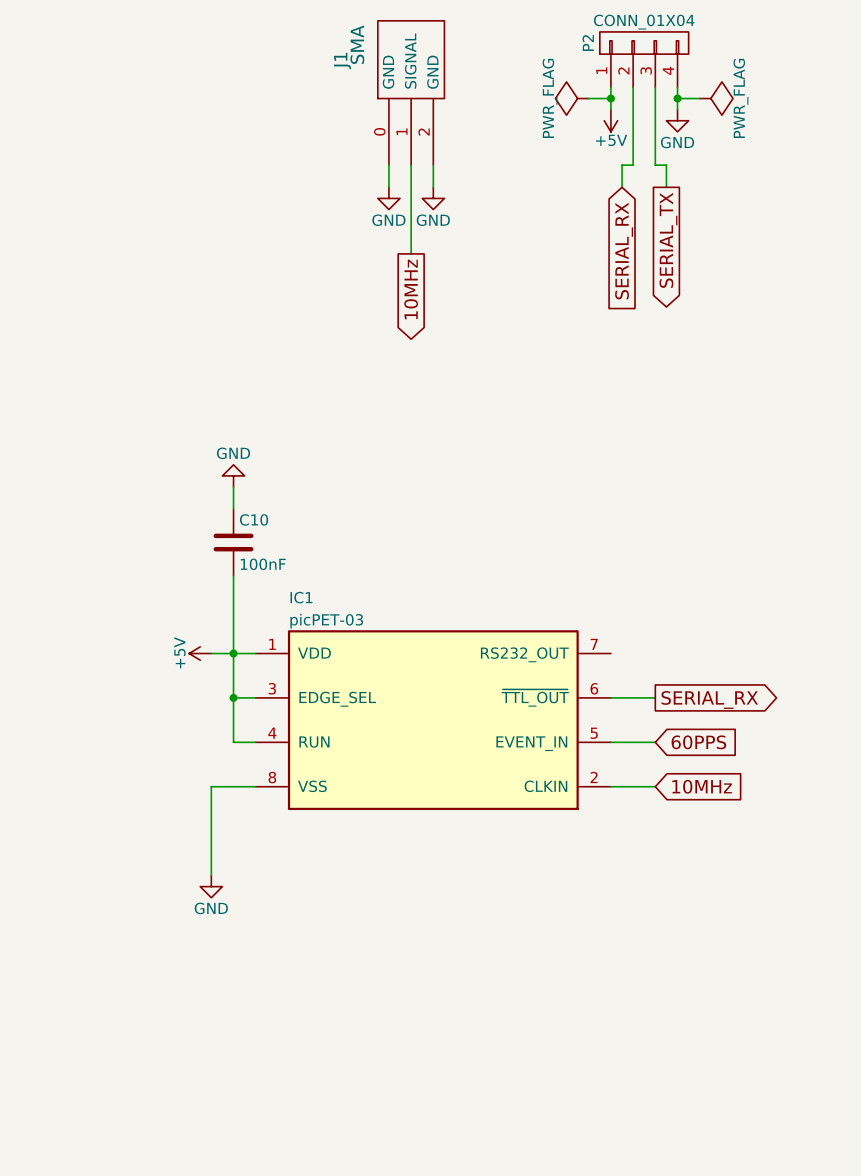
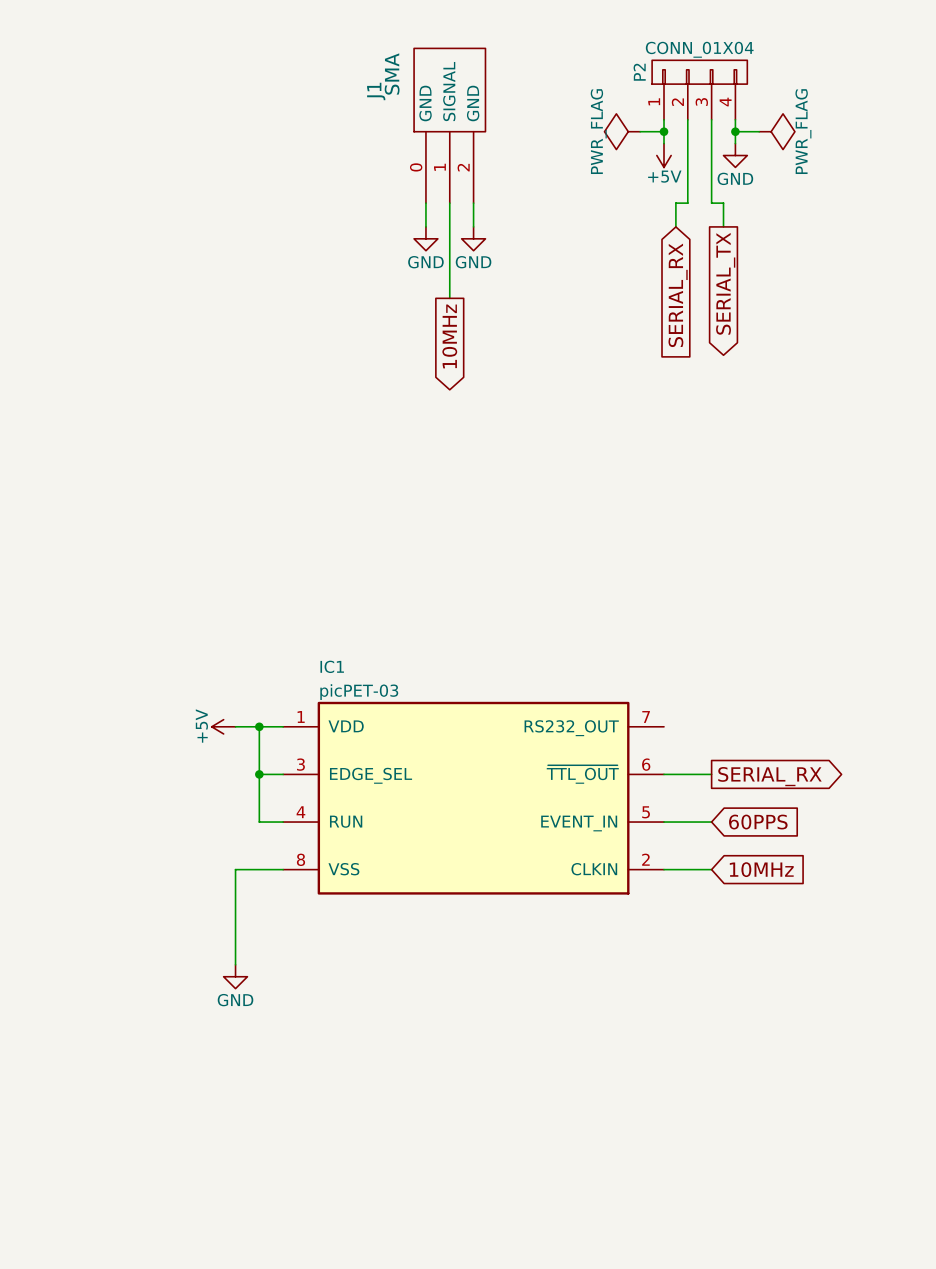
power symbol: GND (233, 475) -> none
wire: (233, 487) (233, 509) -> none
C10: 100nF (233, 542) -> none
wire: (233, 575) (233, 653) -> none

